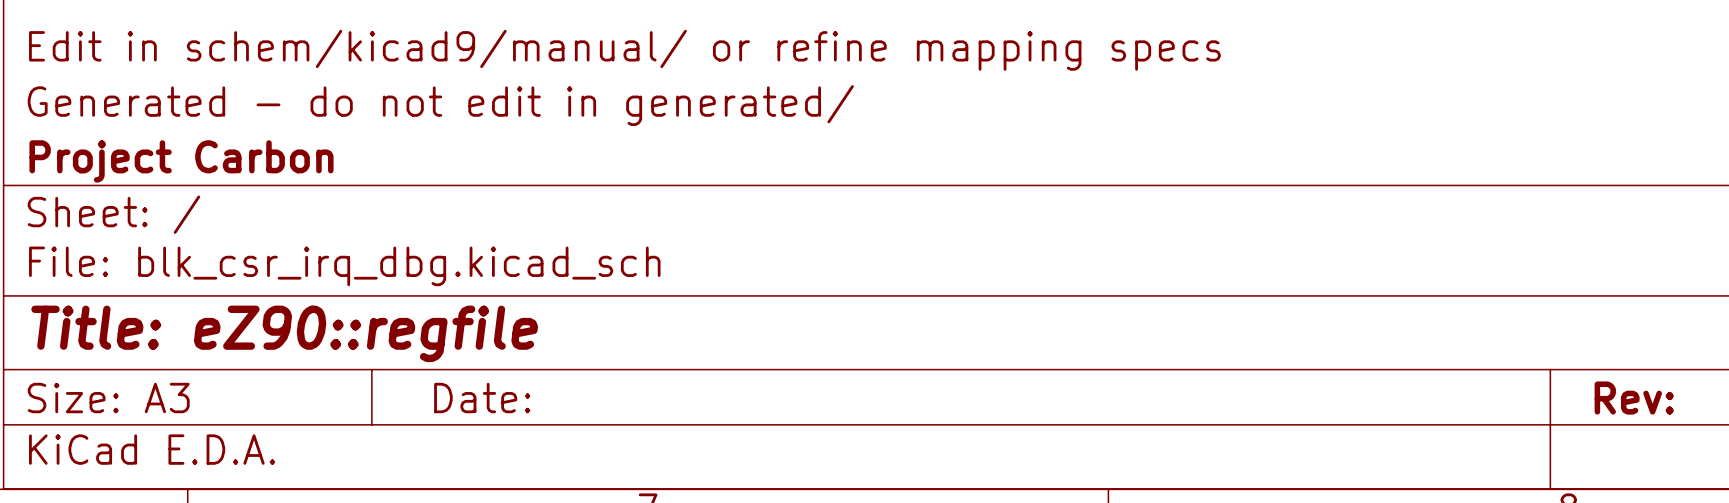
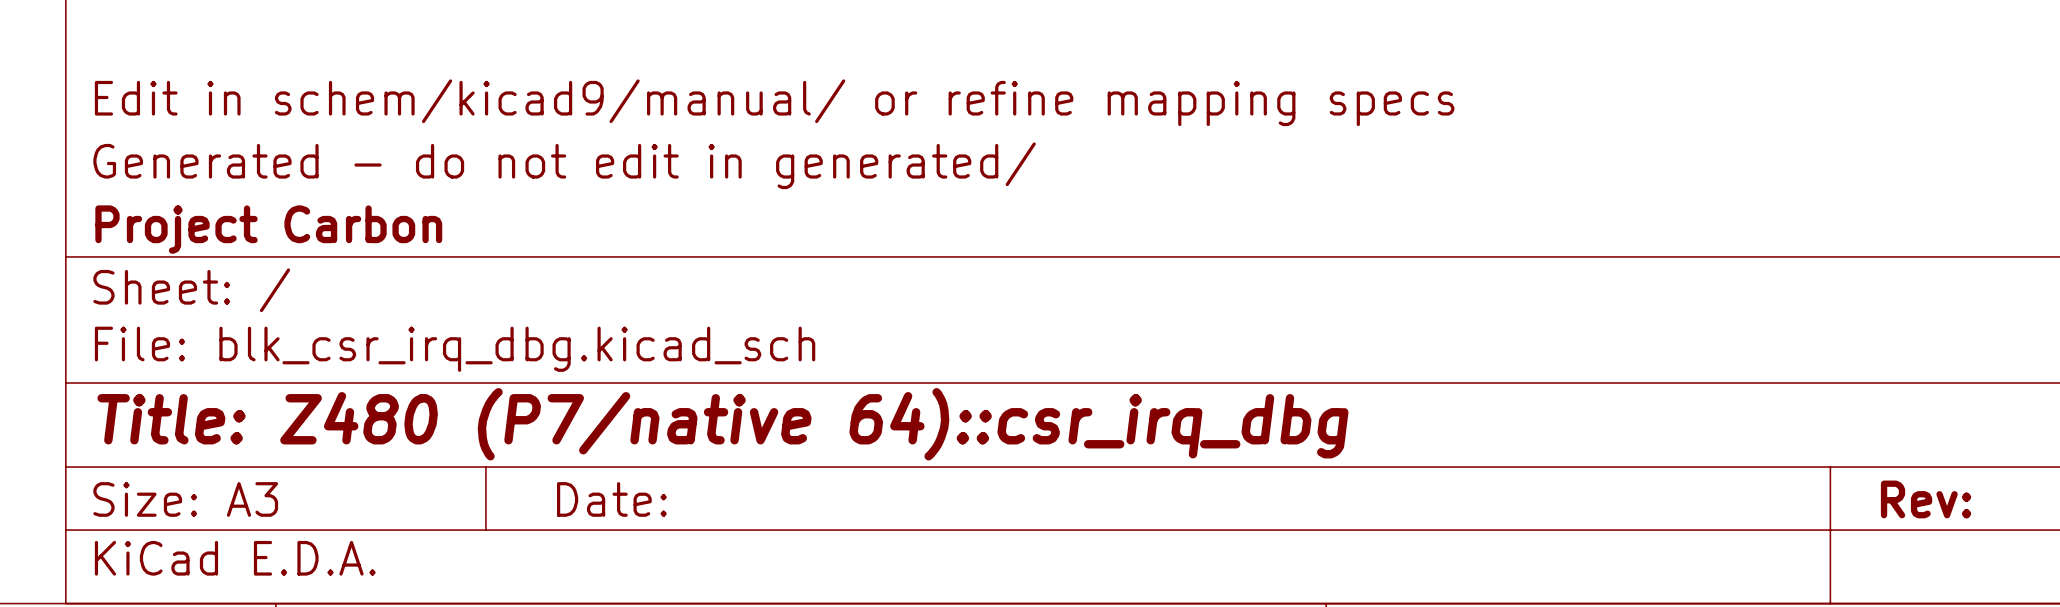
title block: Title: eZ90::regfile (284, 333) -> Title: Z480 (P7/native 64)::csr_irq_dbg (722, 424)

